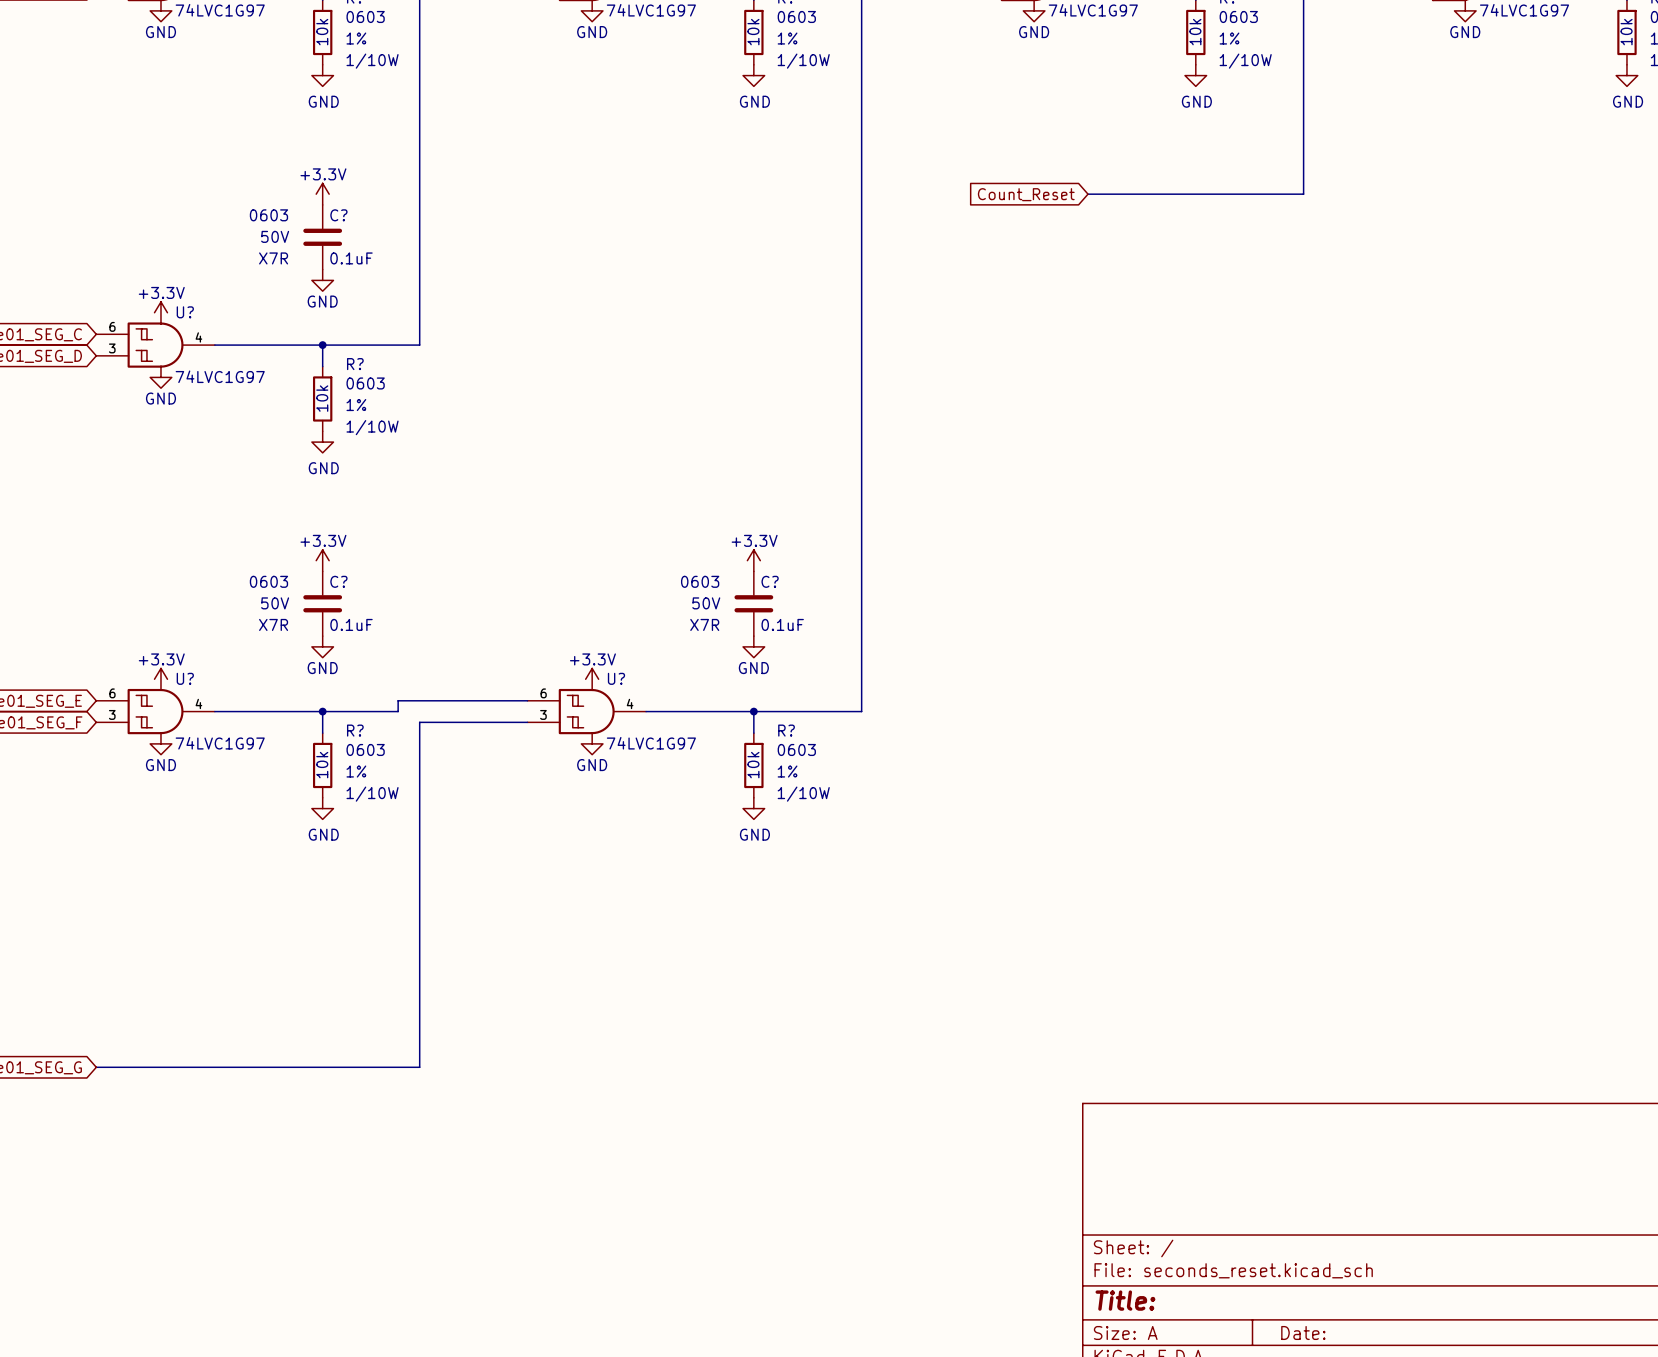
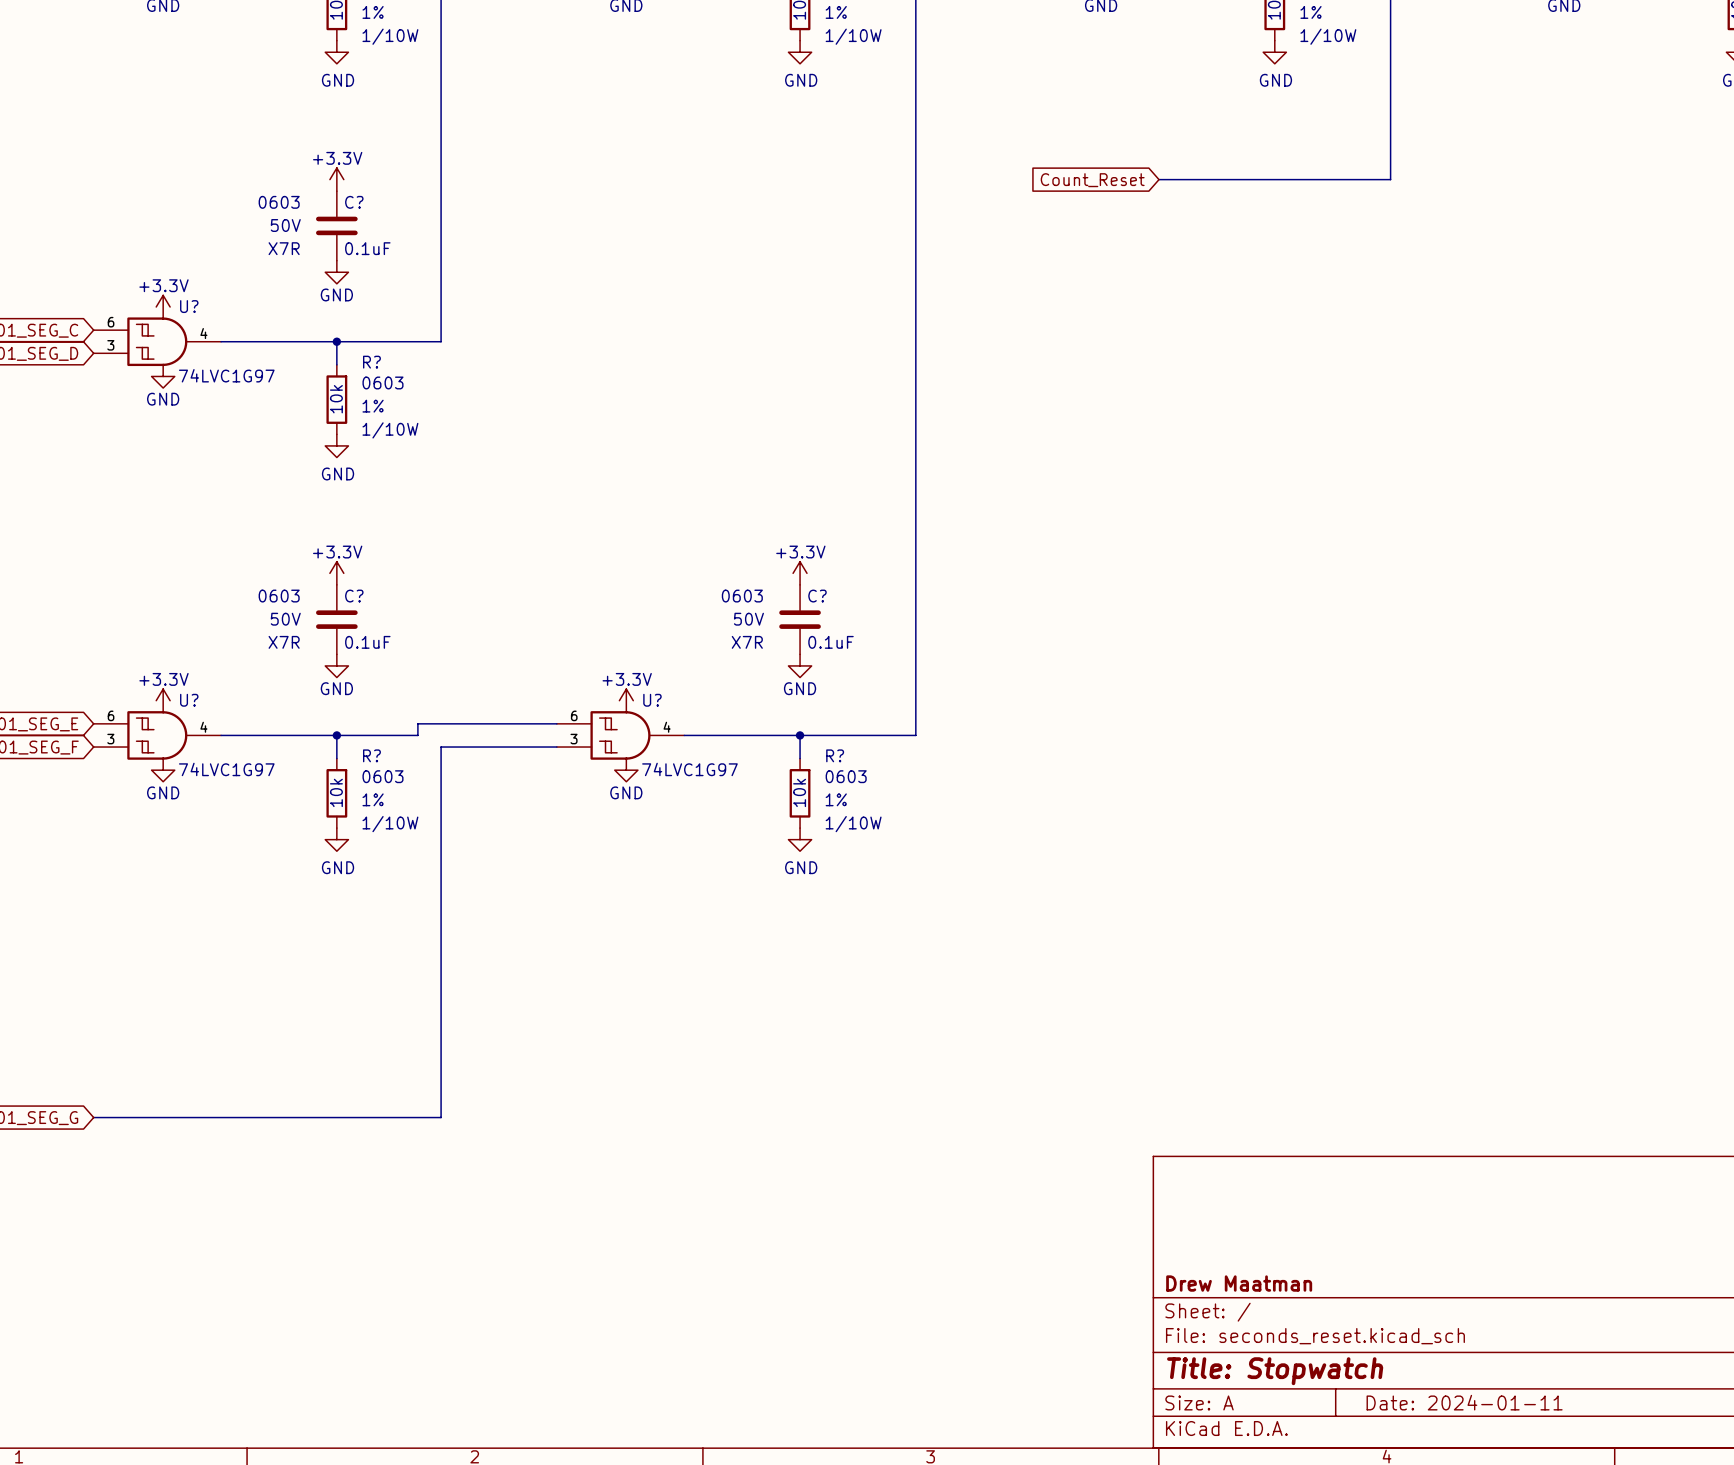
title block: none -> Drew Maatman (1239, 1283)
title block: Title: (1125, 1300) -> Title: Stopwatch (1275, 1371)
title block: Date: (1303, 1332) -> Date: 2024-01-11 (1464, 1402)

